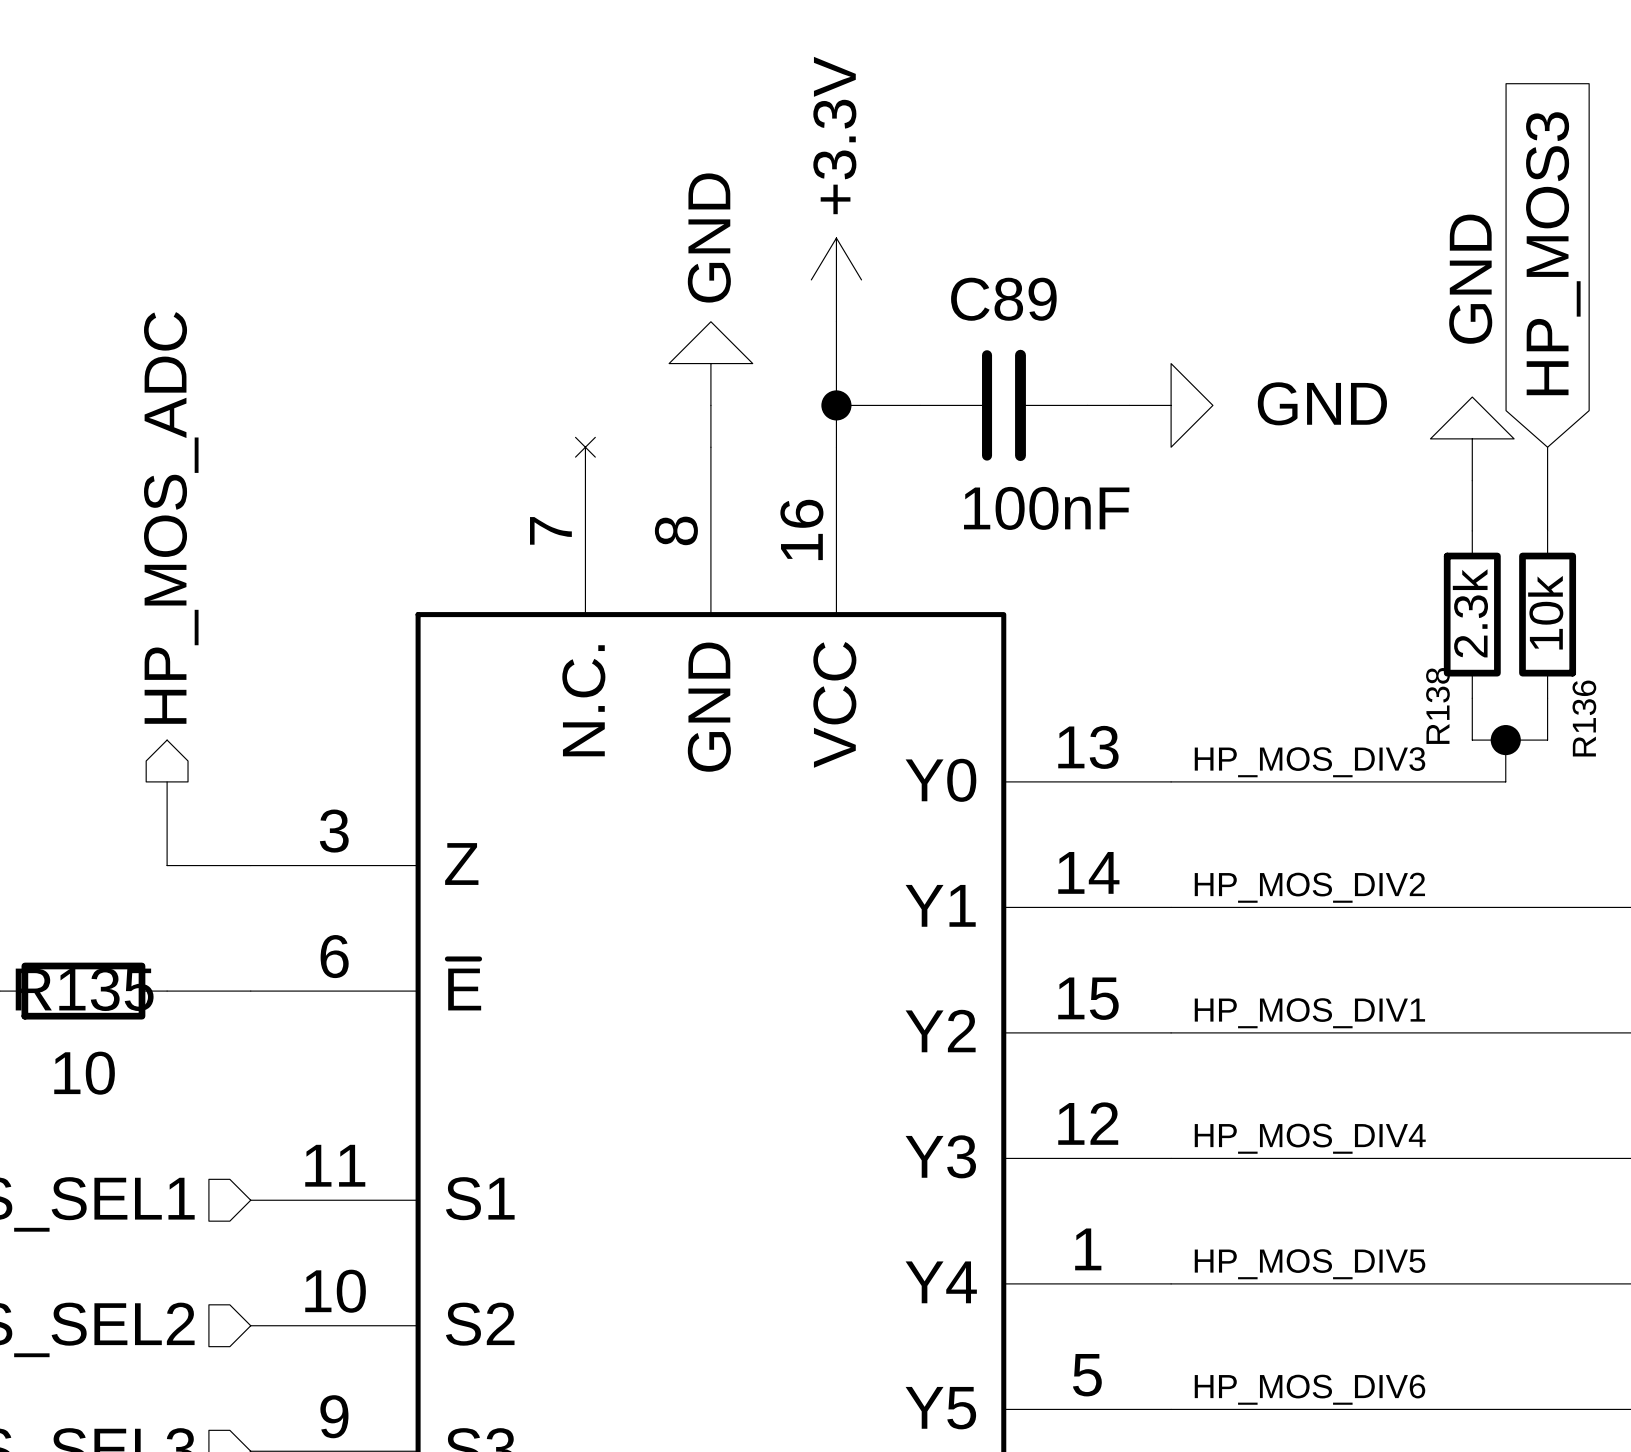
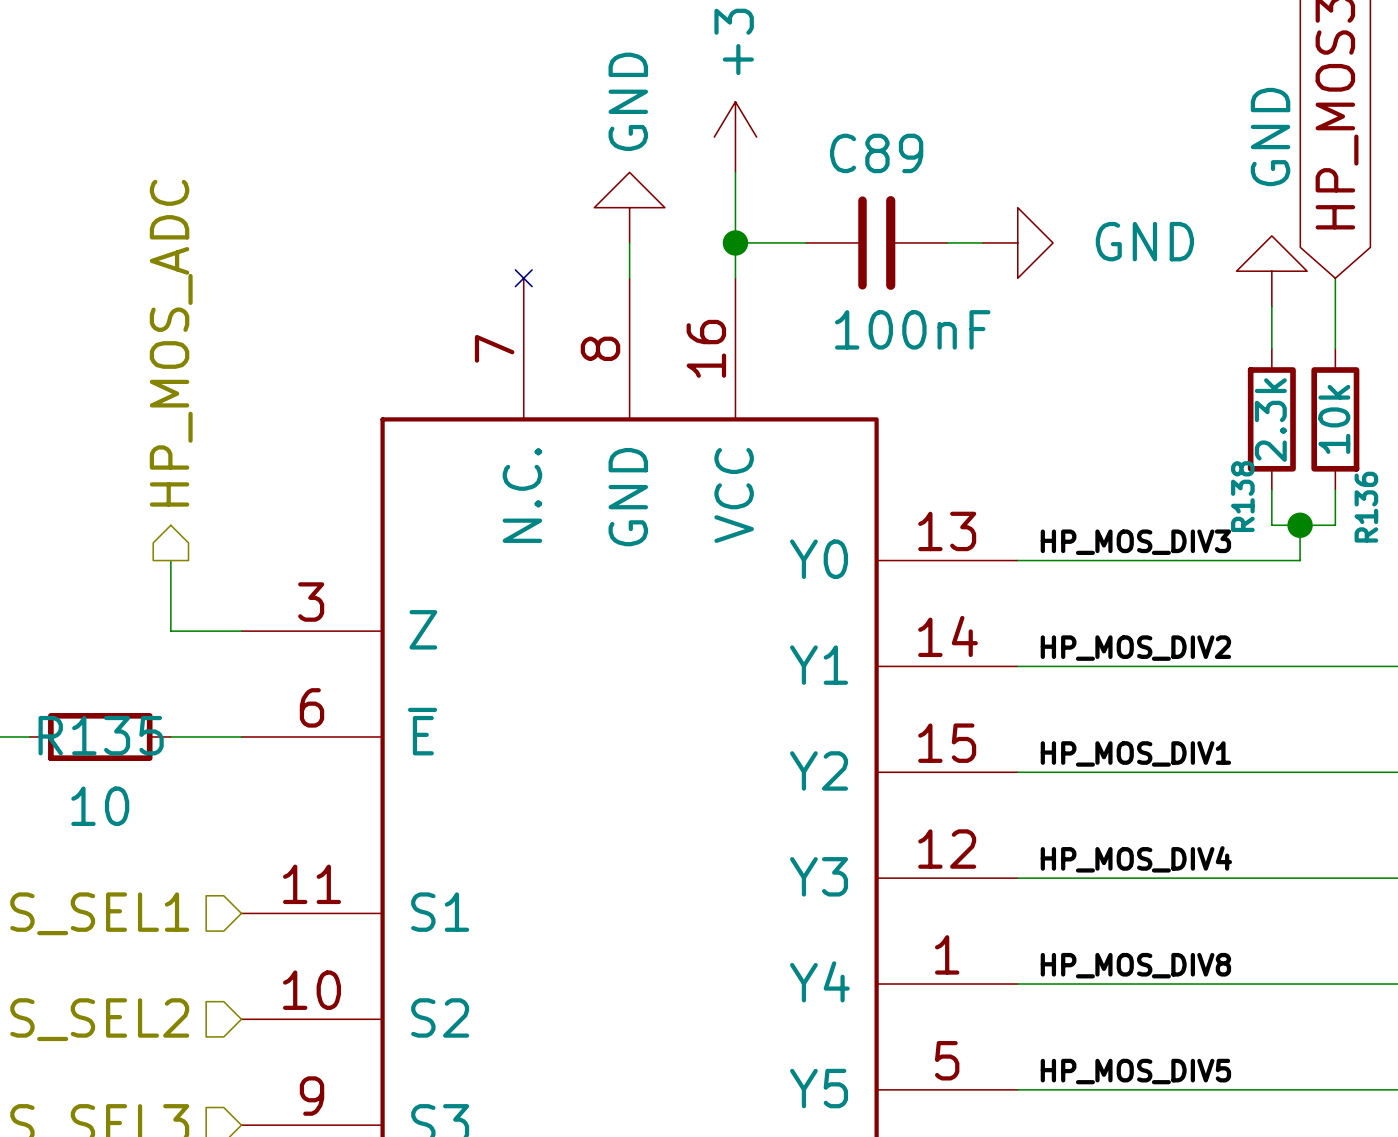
label: HP_MOS_DIV5 (1310, 1264) -> HP_MOS_DIV8 (1135, 965)
label: HP_MOS_DIV6 (1309, 1389) -> HP_MOS_DIV5 (1135, 1071)

